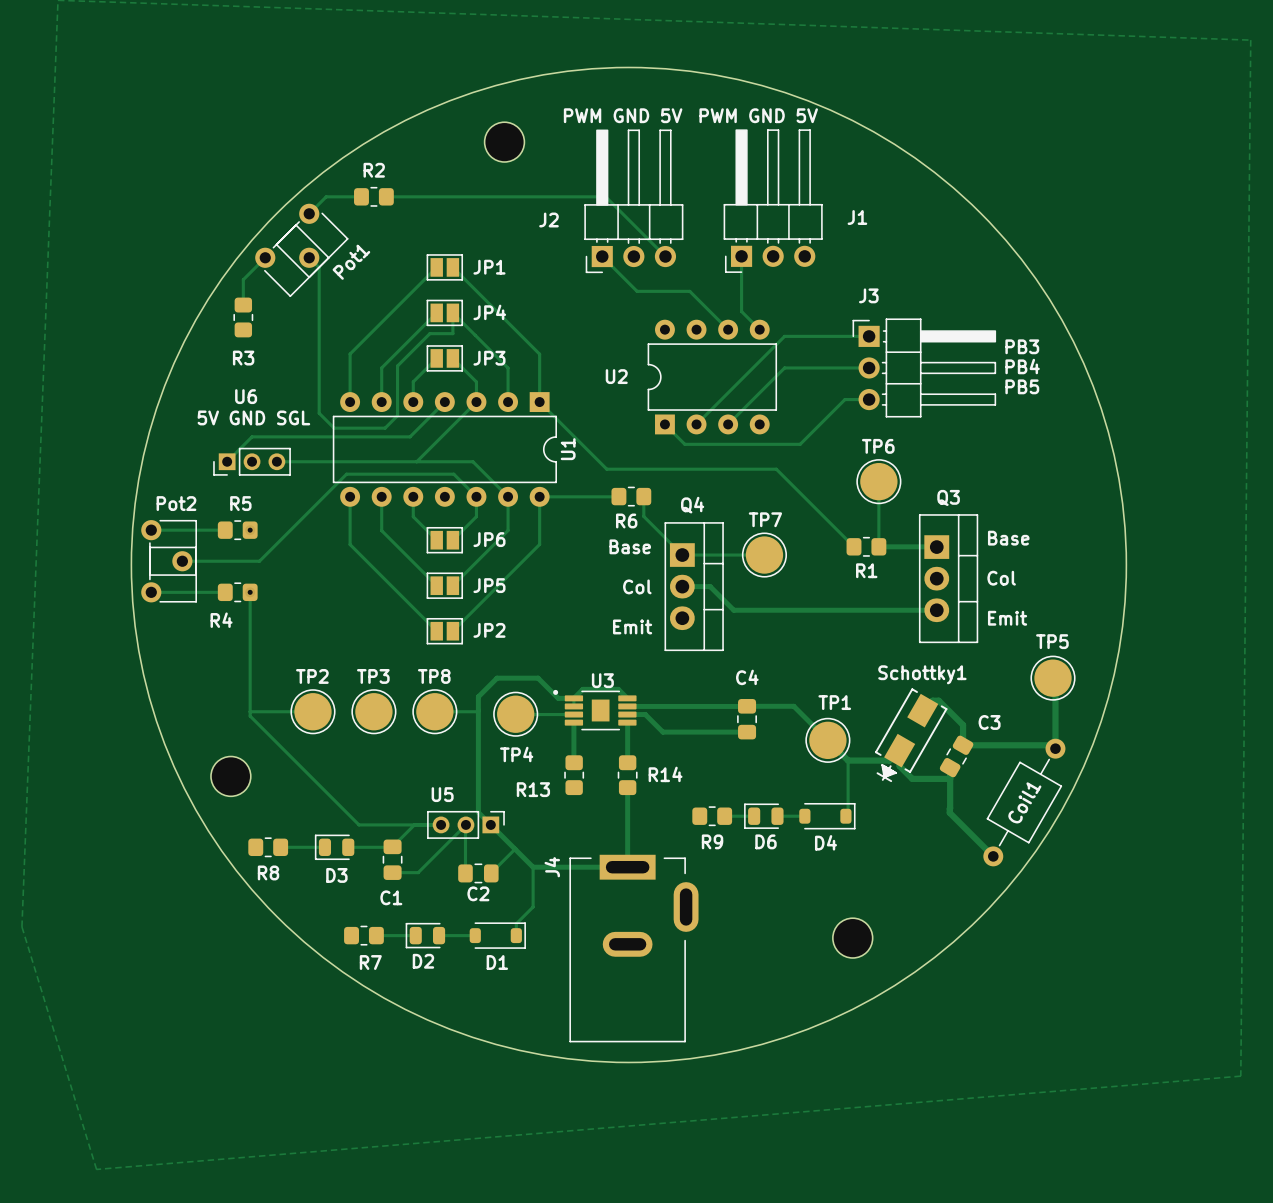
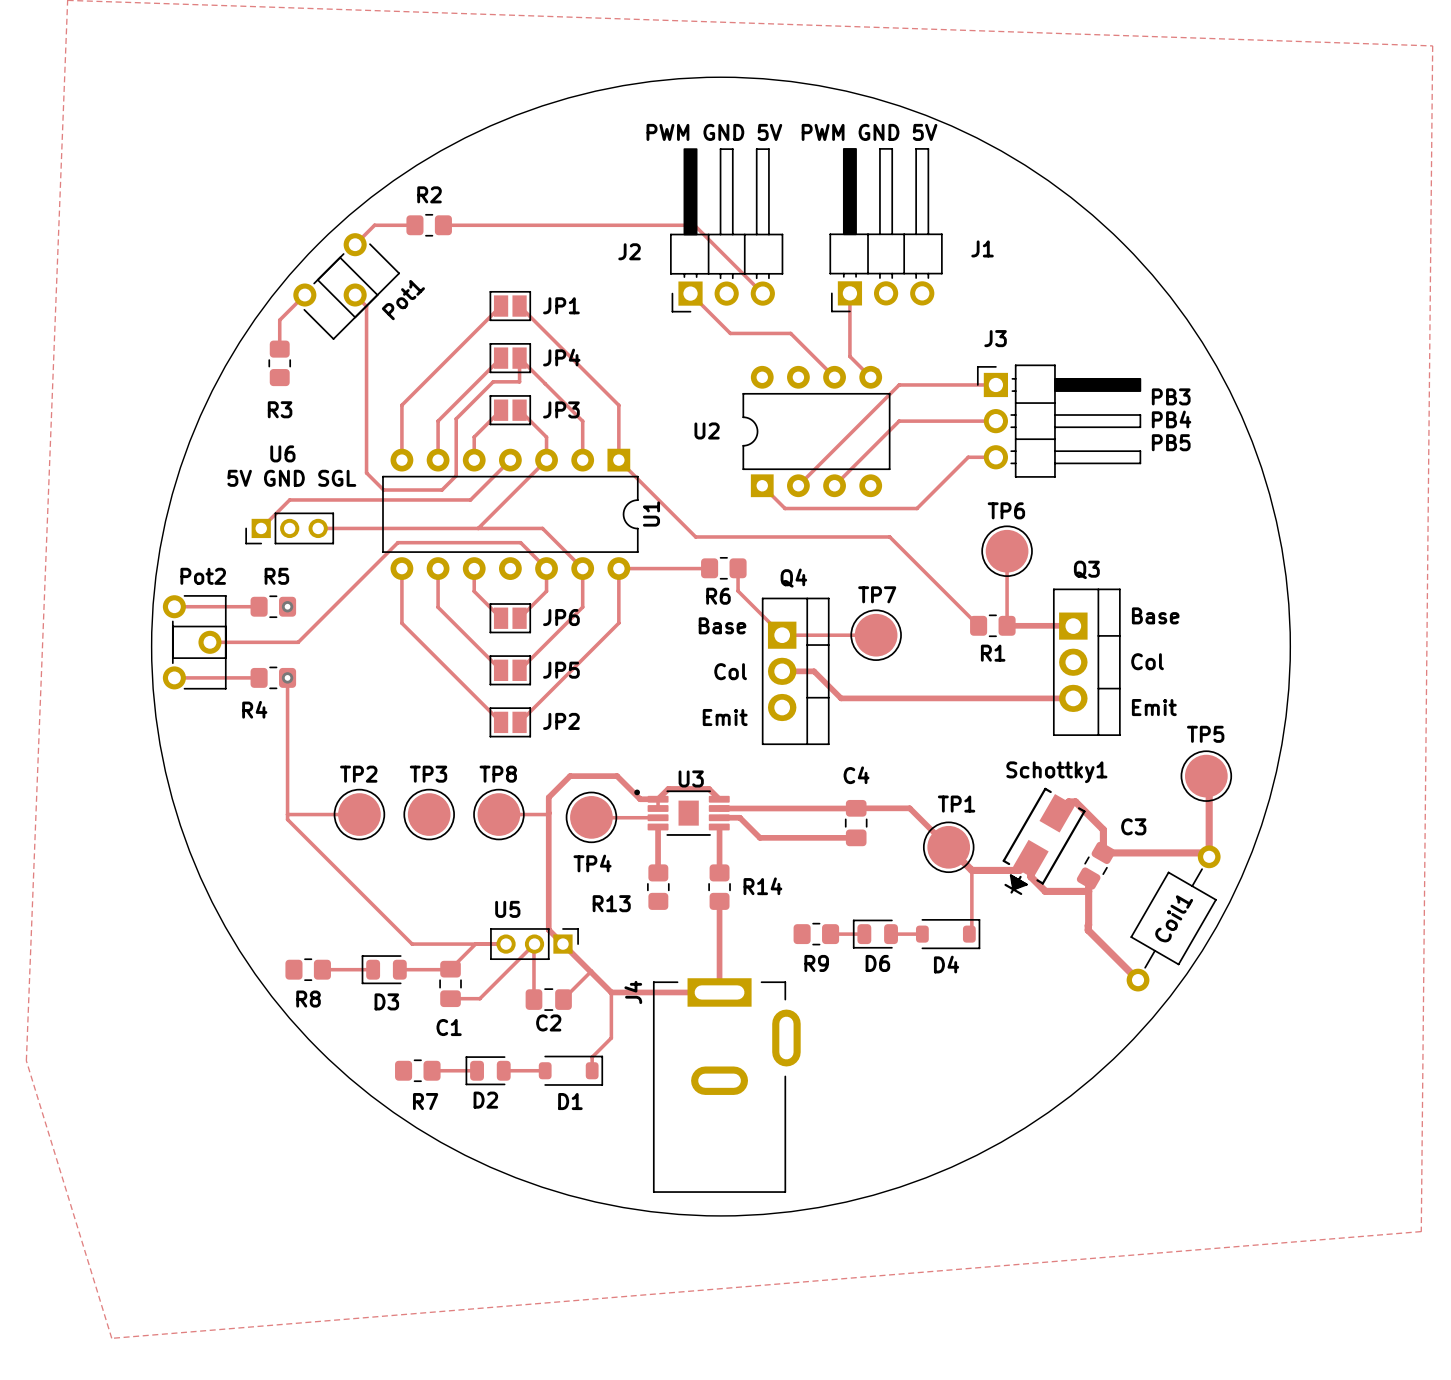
part: (504, 142) -> none
part: (230, 776) -> none
part: (852, 938) -> none

